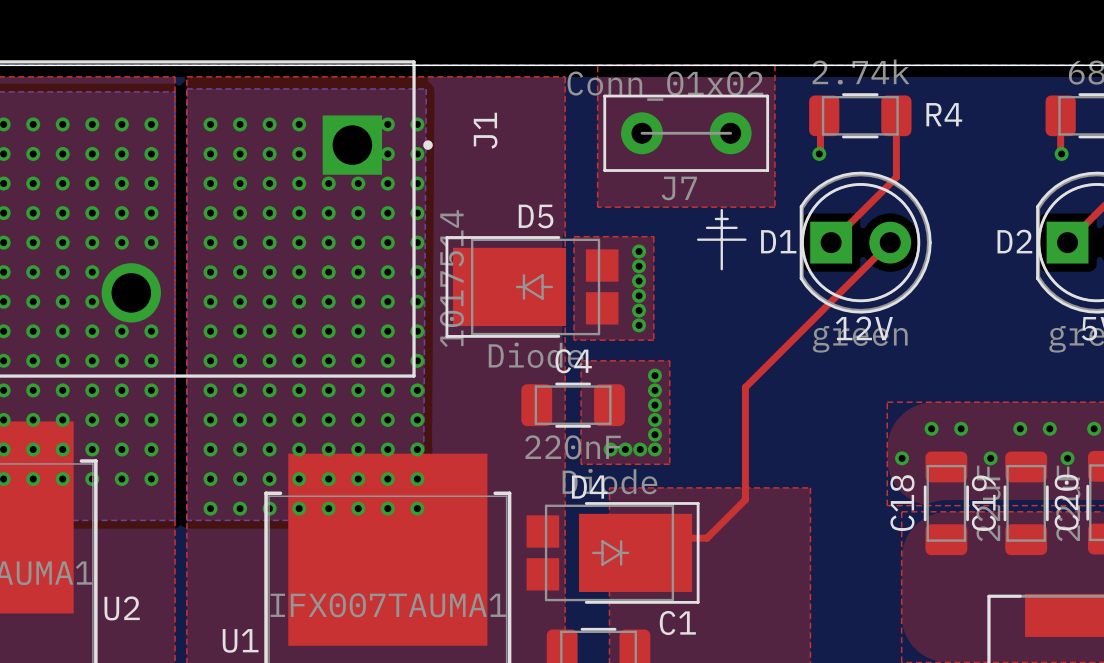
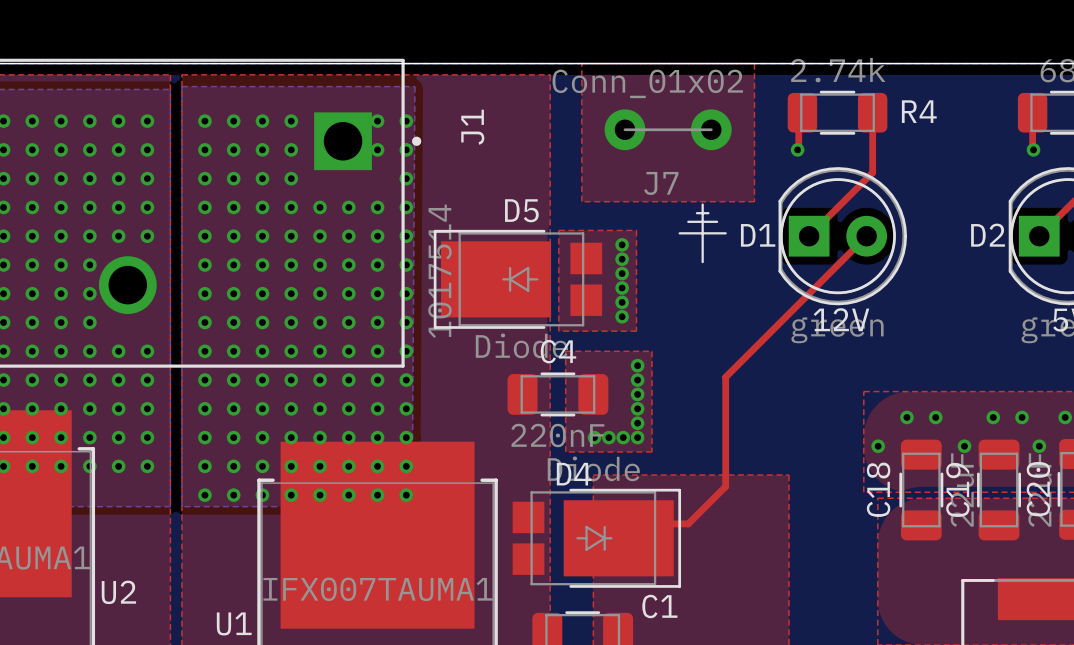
J7 footprint: [603, 94, 770, 172] -> [604, 109, 732, 151]
via: (328, 183) -> none
via: (358, 183) -> none
via: (387, 183) -> none
via: (121, 331) -> none
via: (151, 331) -> none

